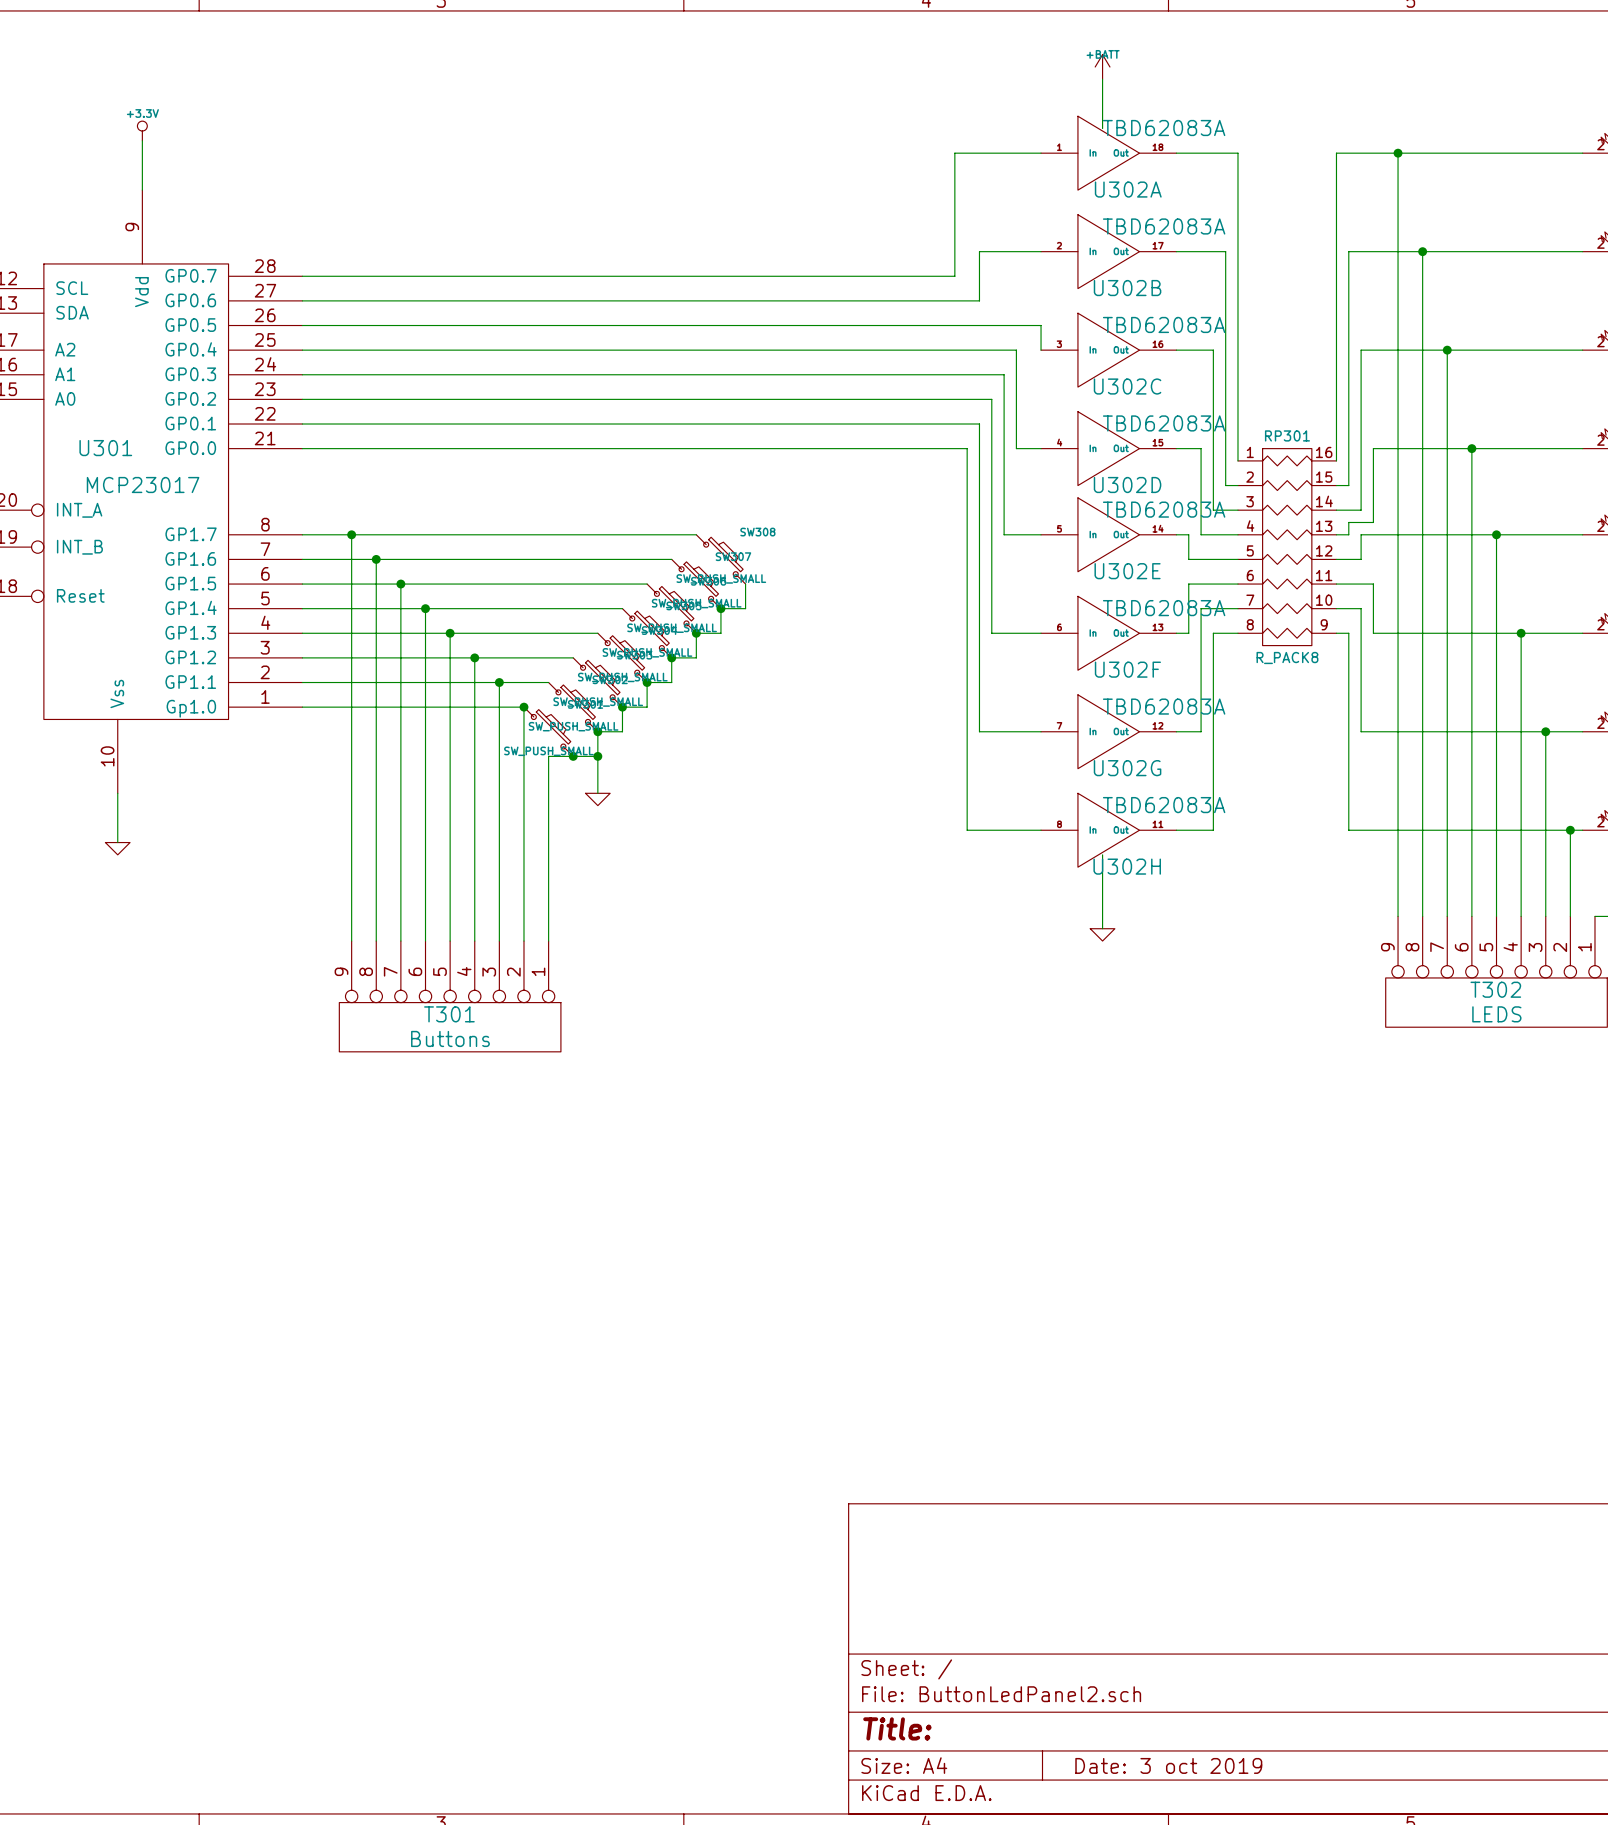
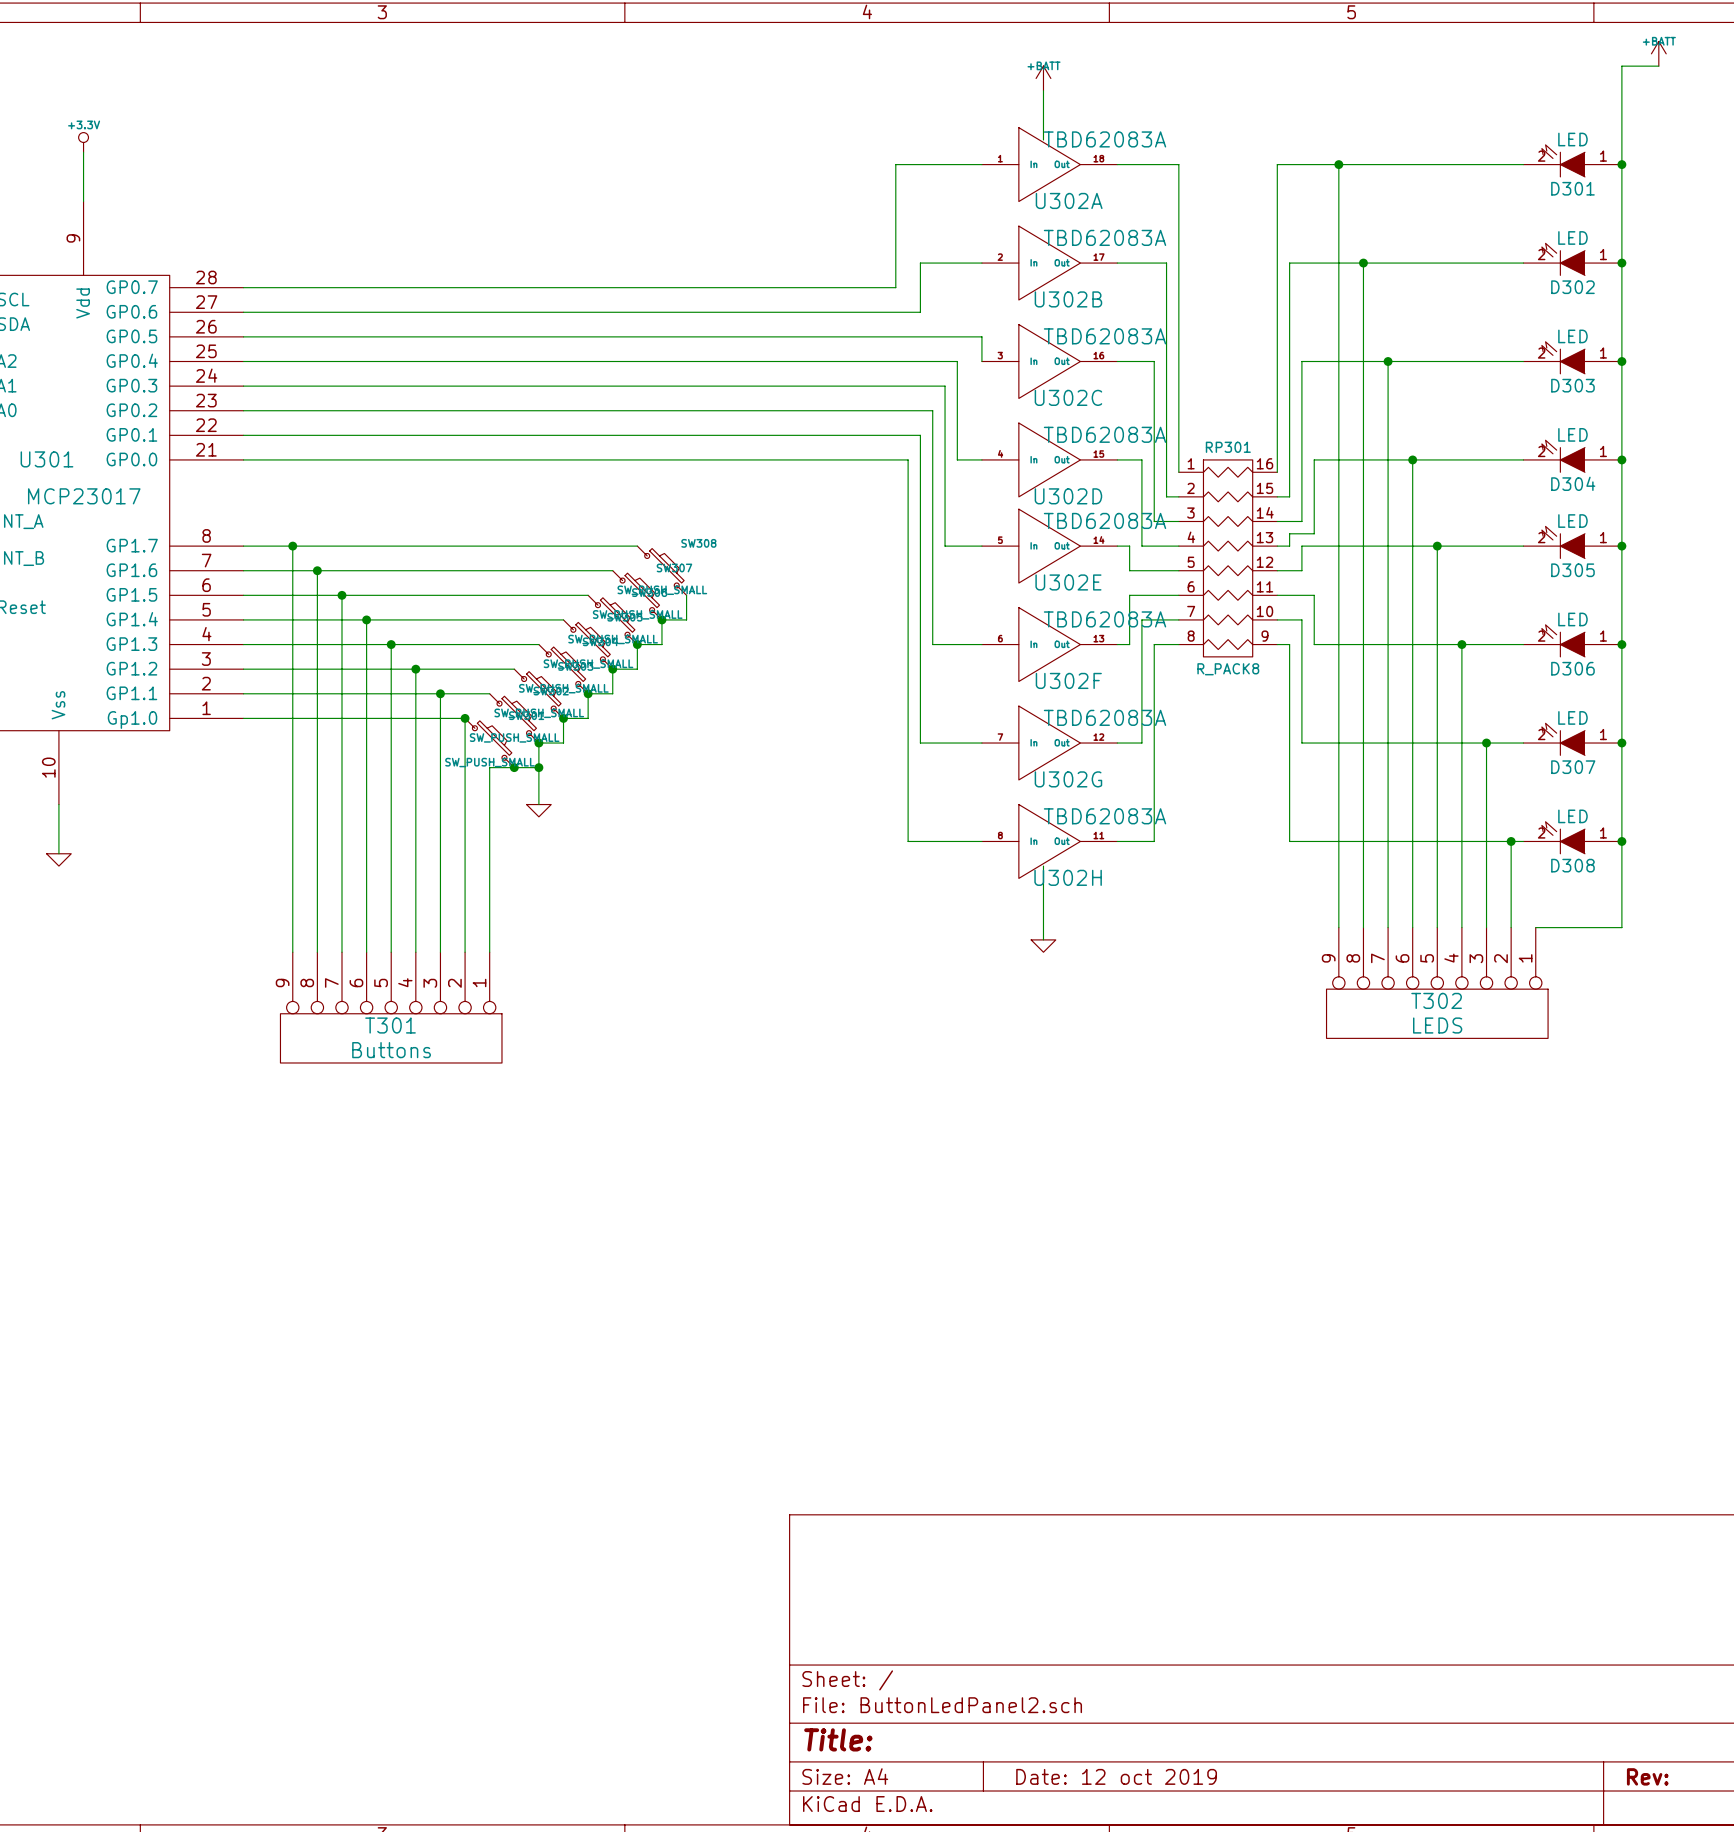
title block: Date: 3 oct 2019 (1168, 1765) -> Date: 12 oct 2019 (1116, 1776)

